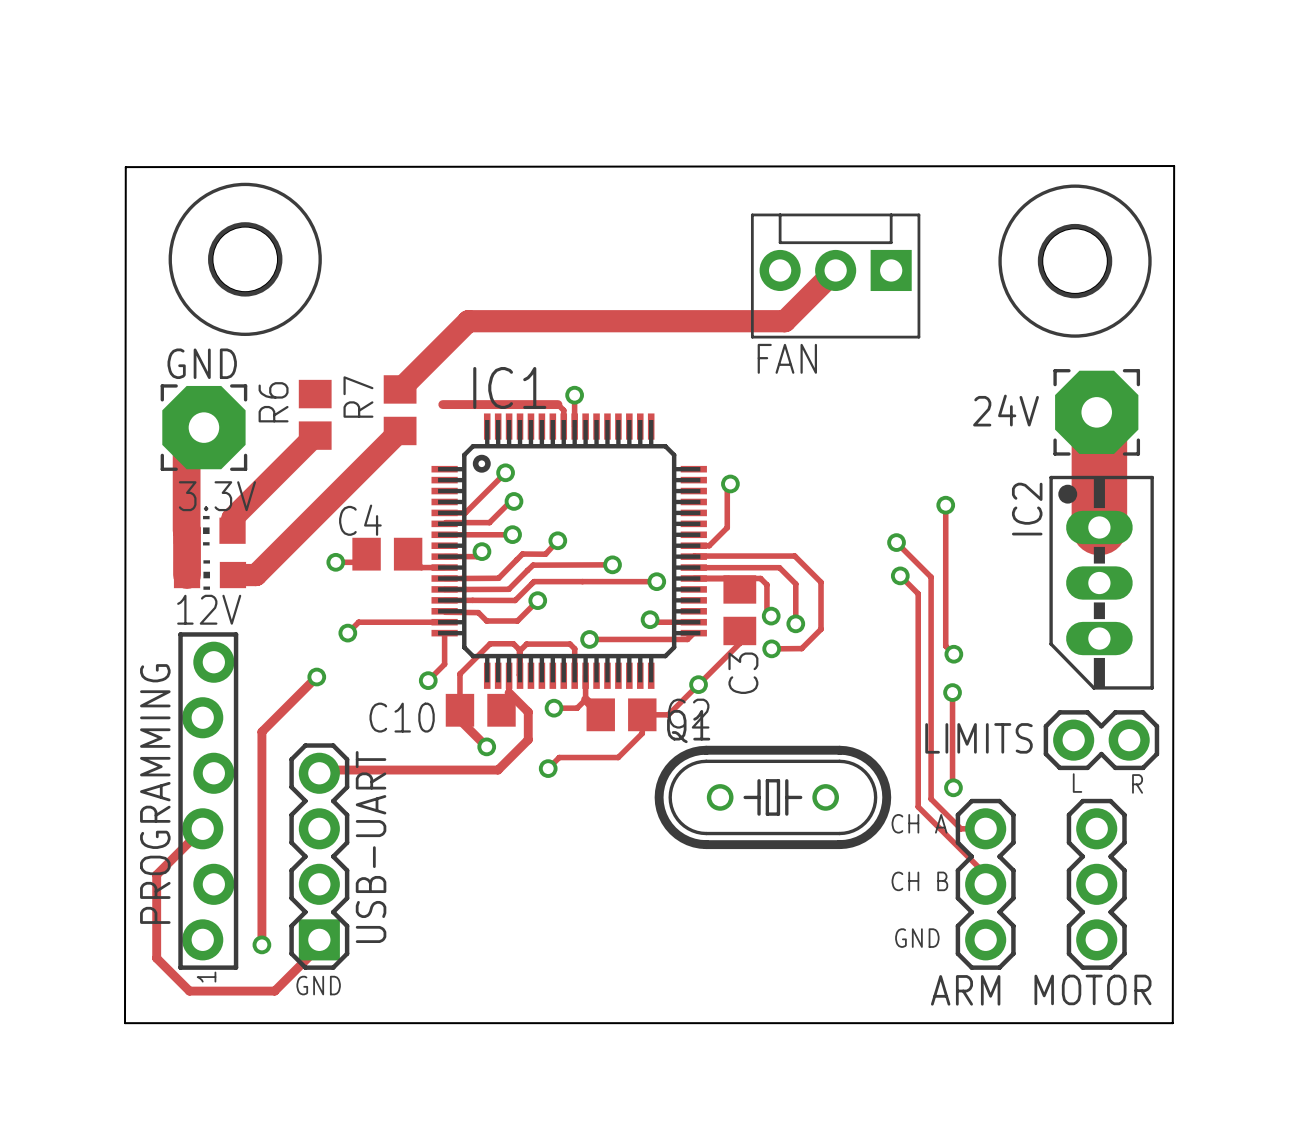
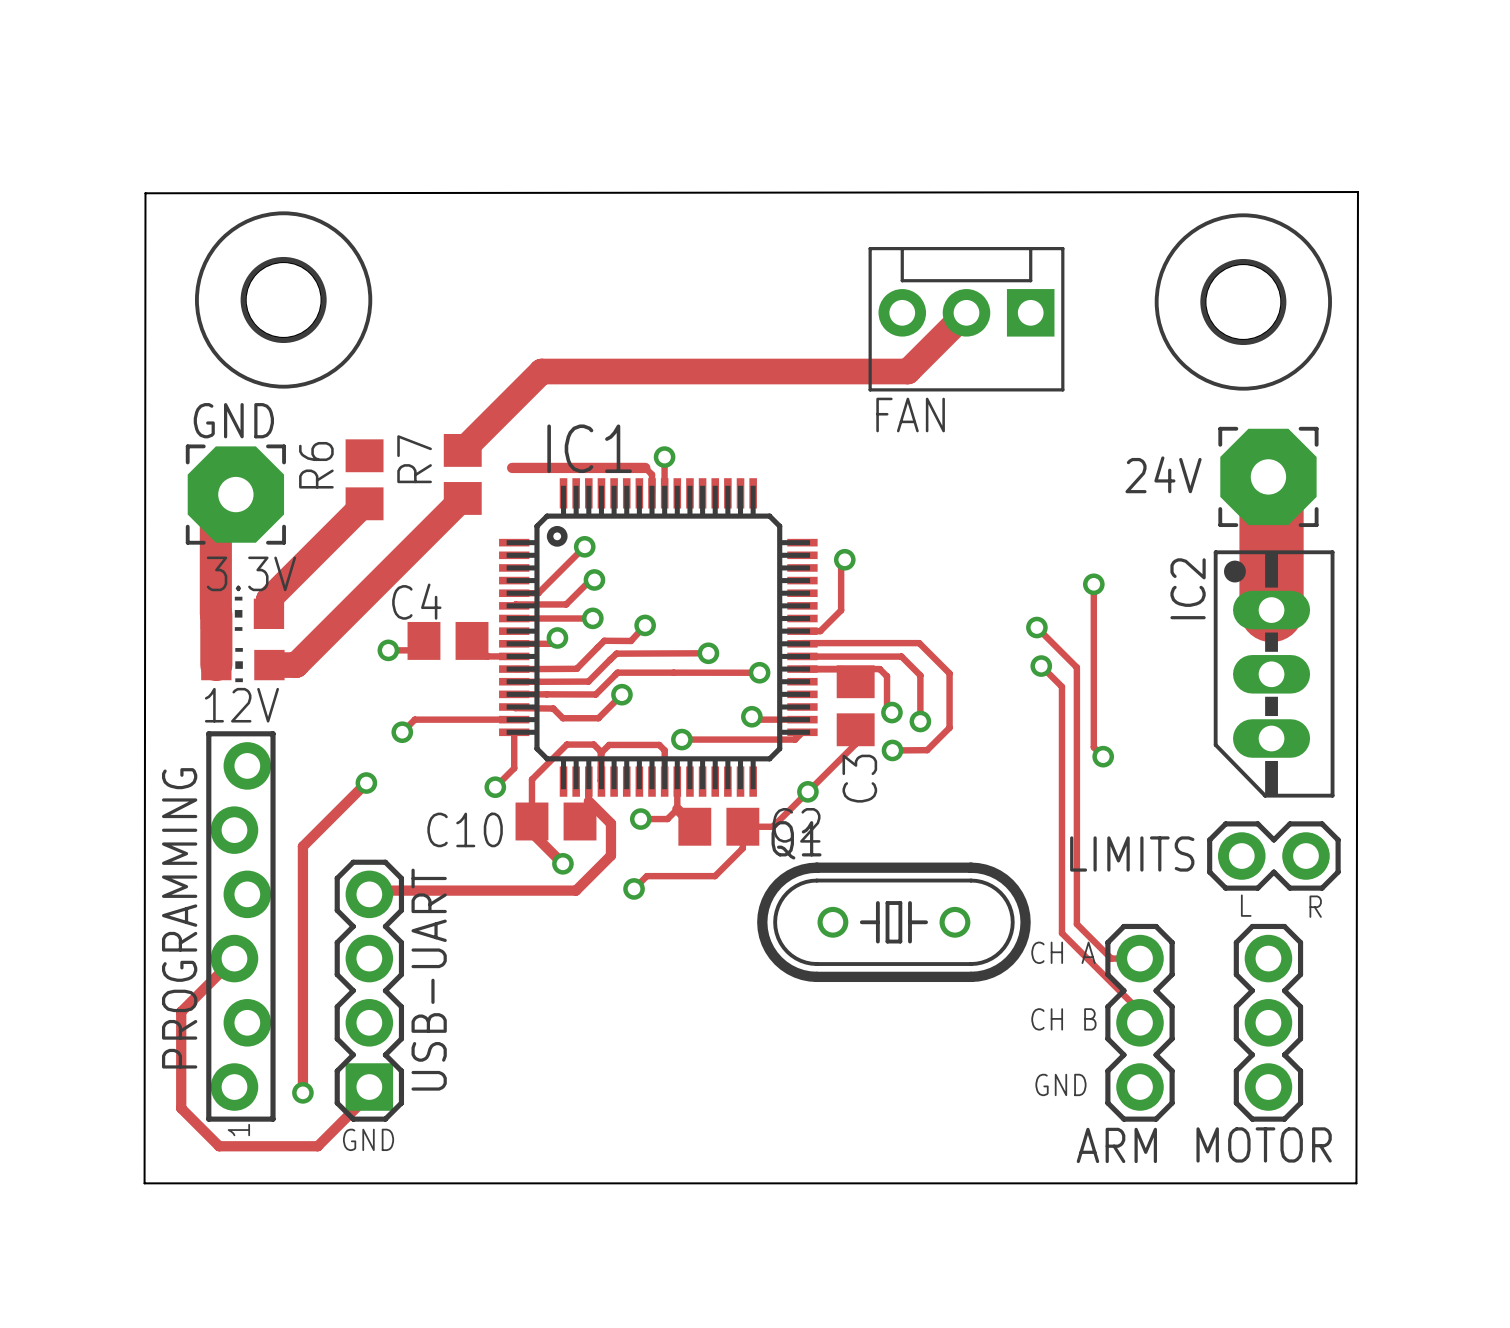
track: (952, 692) (953, 787) -> none
via: (952, 692) -> none
via: (953, 787) -> none

